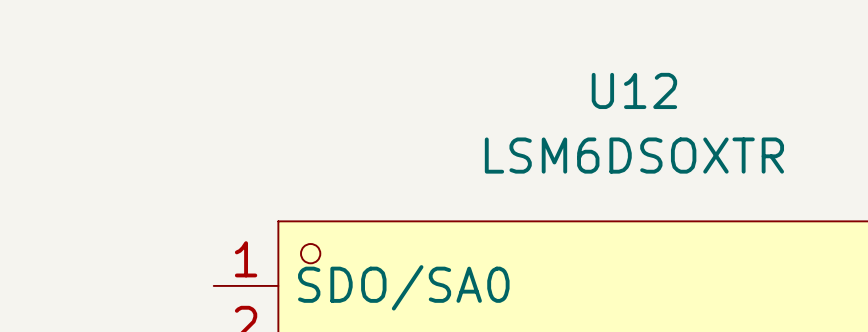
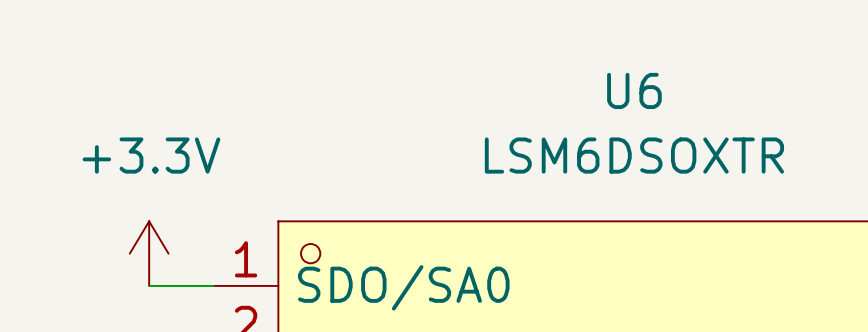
U12 name: U12 (634, 90) -> U6 (634, 90)
power symbol: none -> +3.3V (149, 253)
wire: none -> (149, 285) (213, 285)

